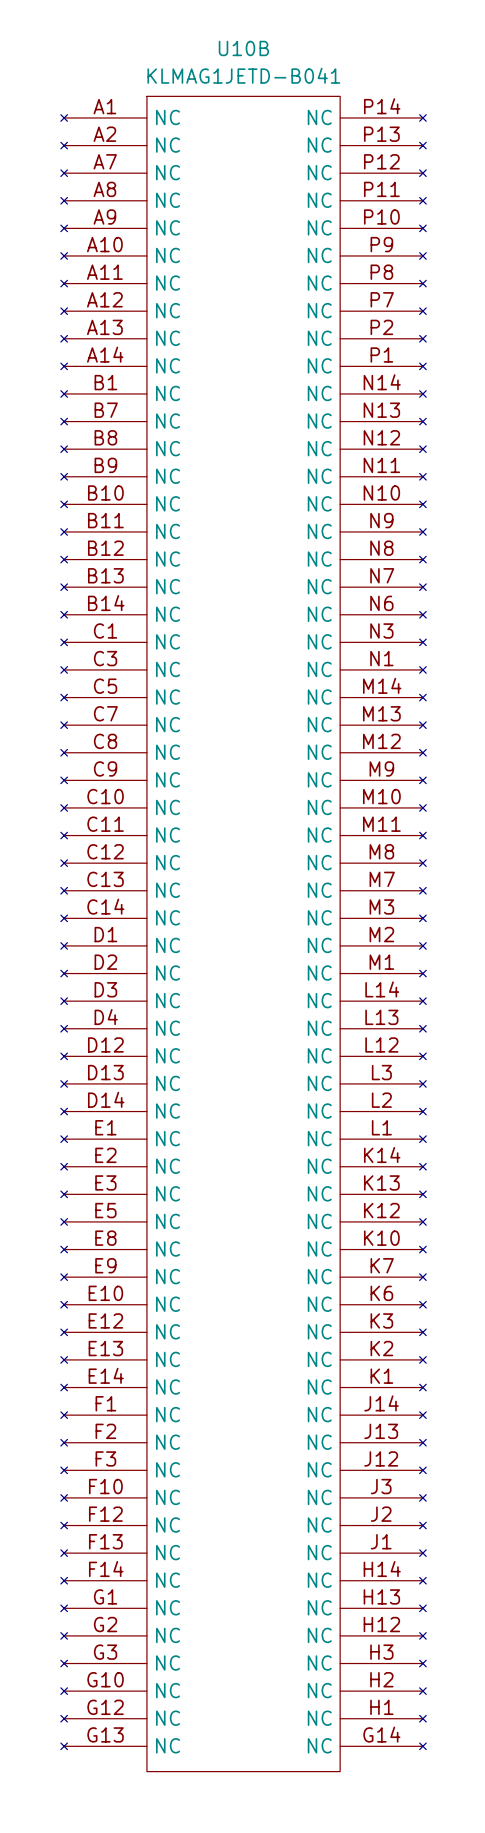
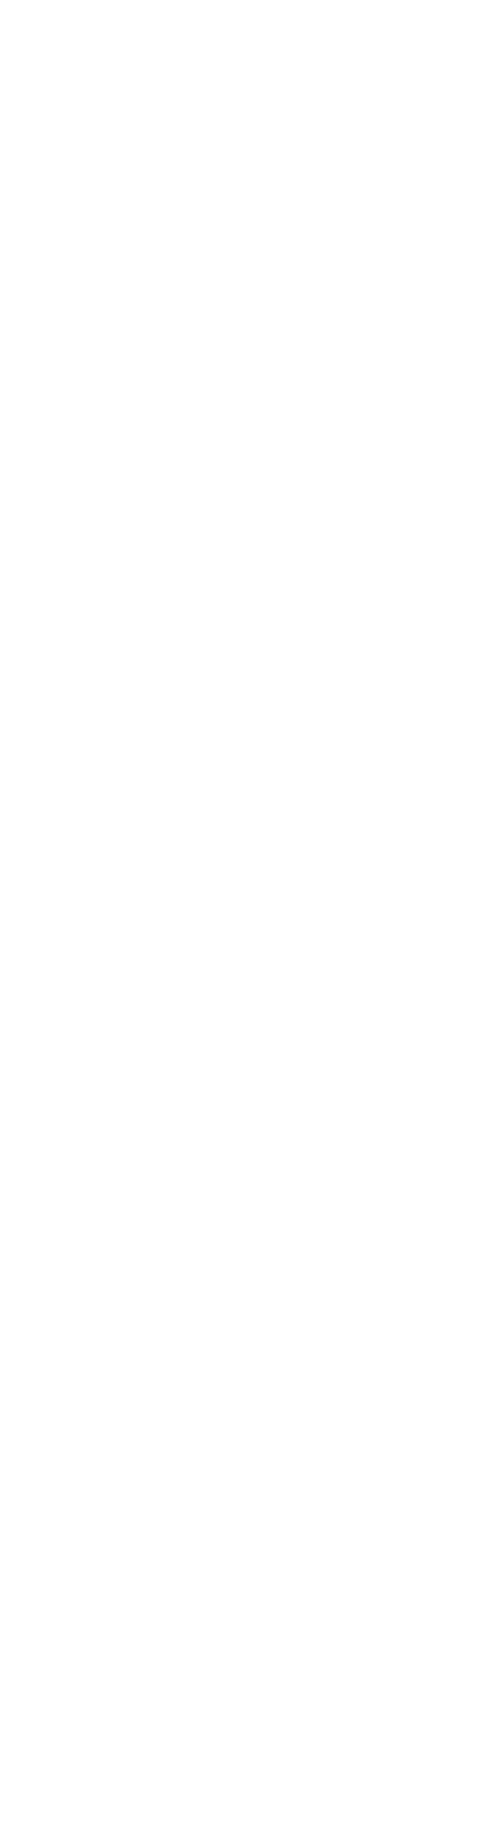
U10B: KLMAG1JETD-B041 (243, 933) -> none

